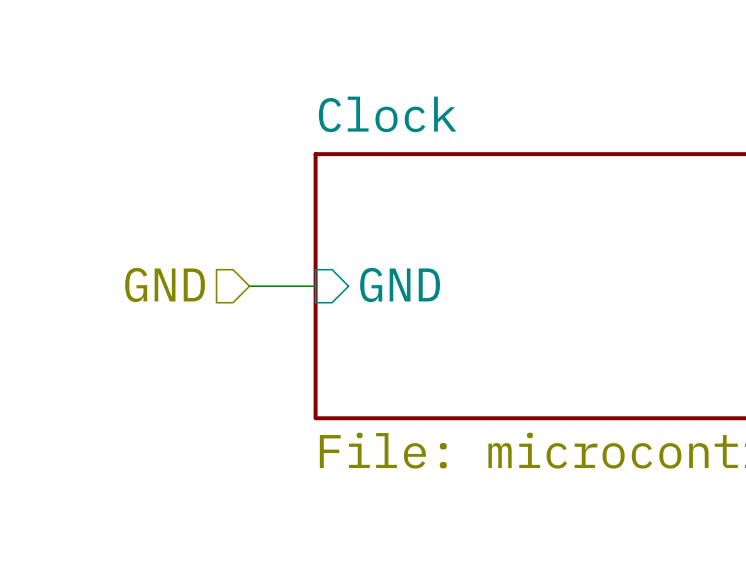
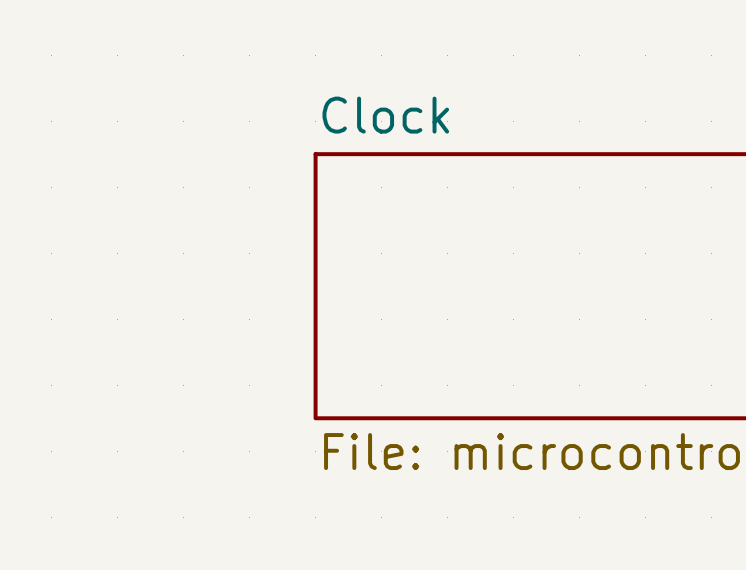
hierarchical label: GND (165, 284) -> none
sheet pin: GND (400, 284) -> none
wire: (249, 286) (315, 286) -> none

